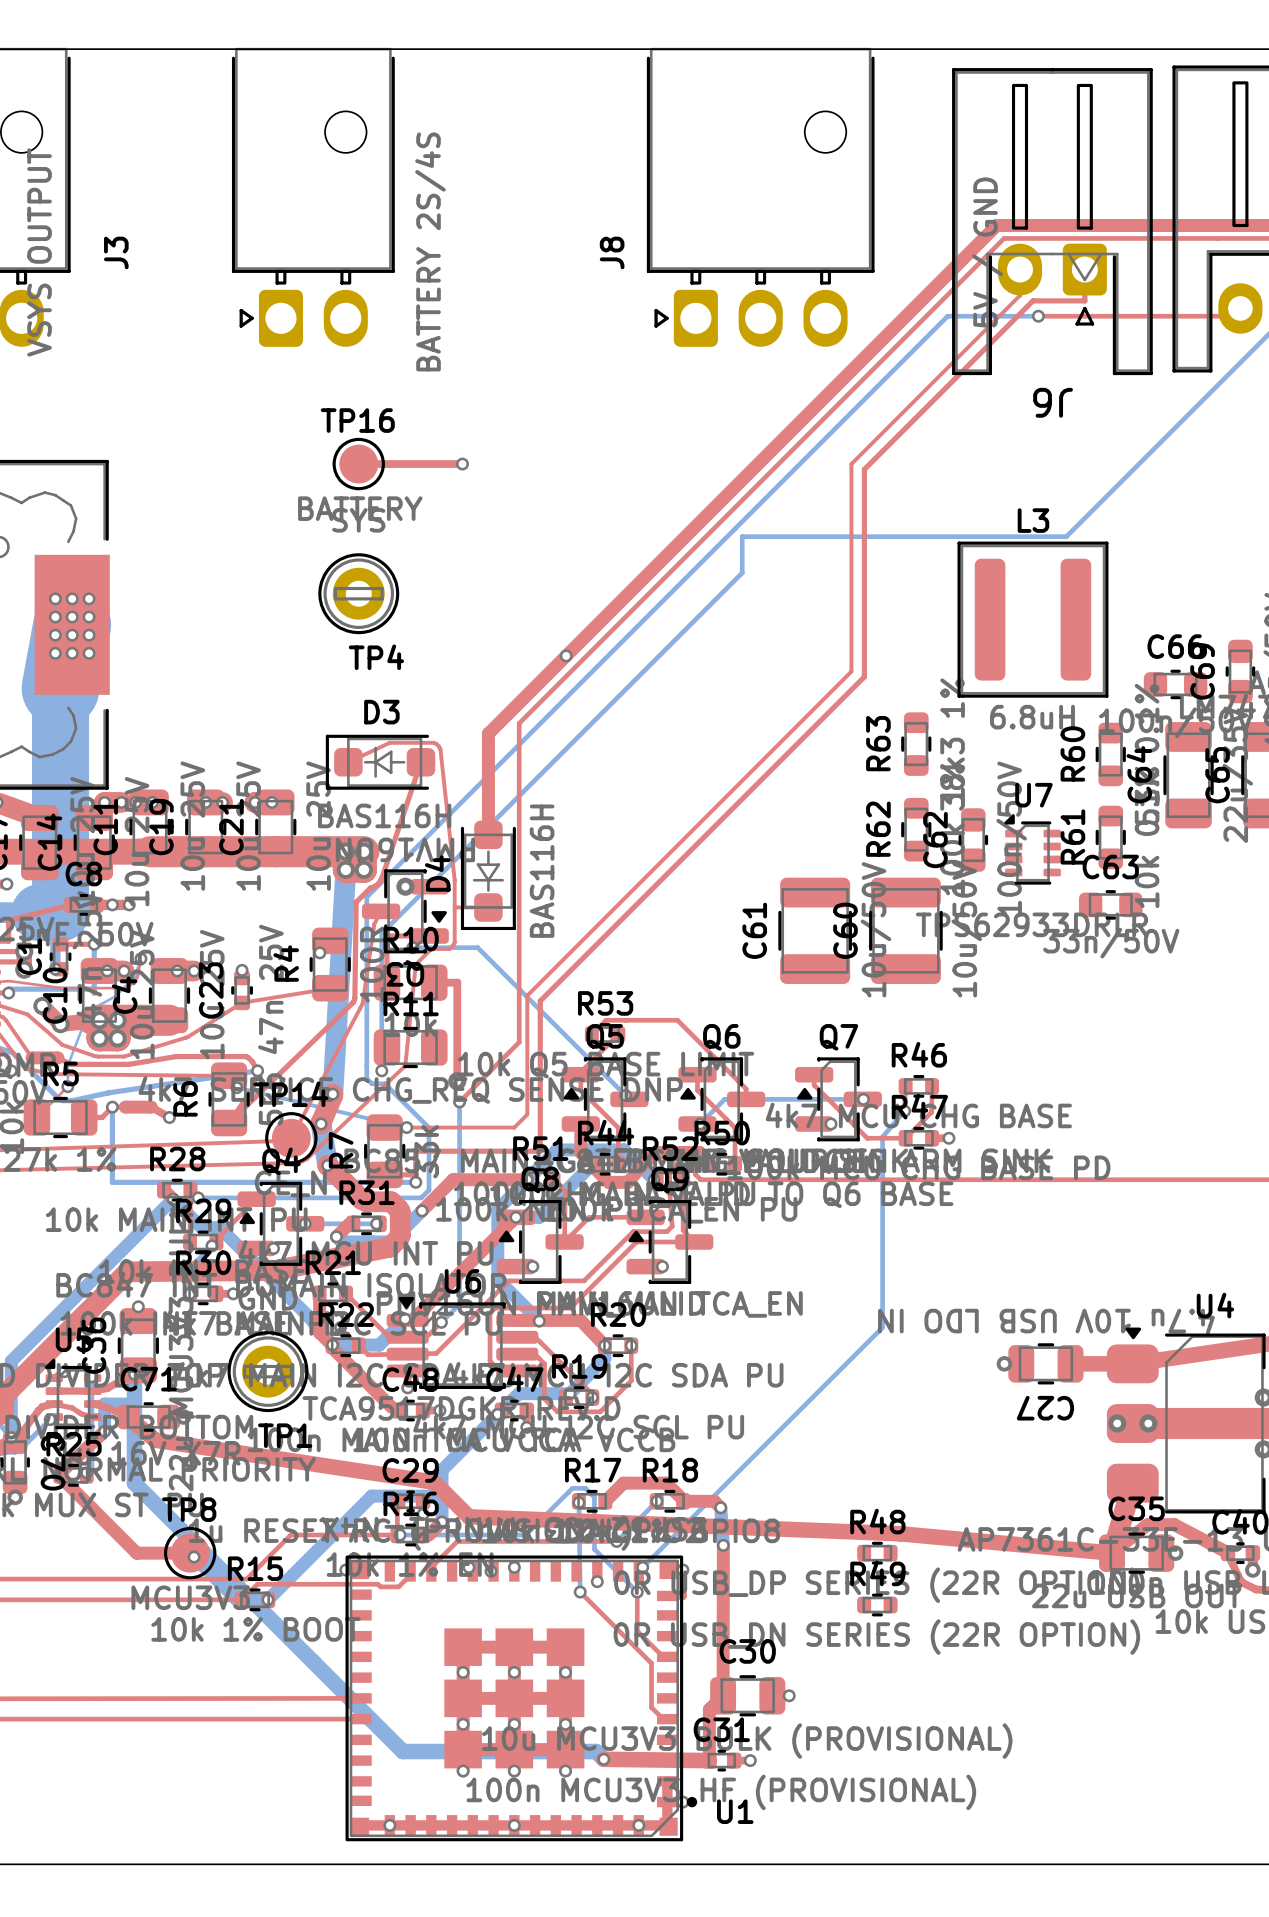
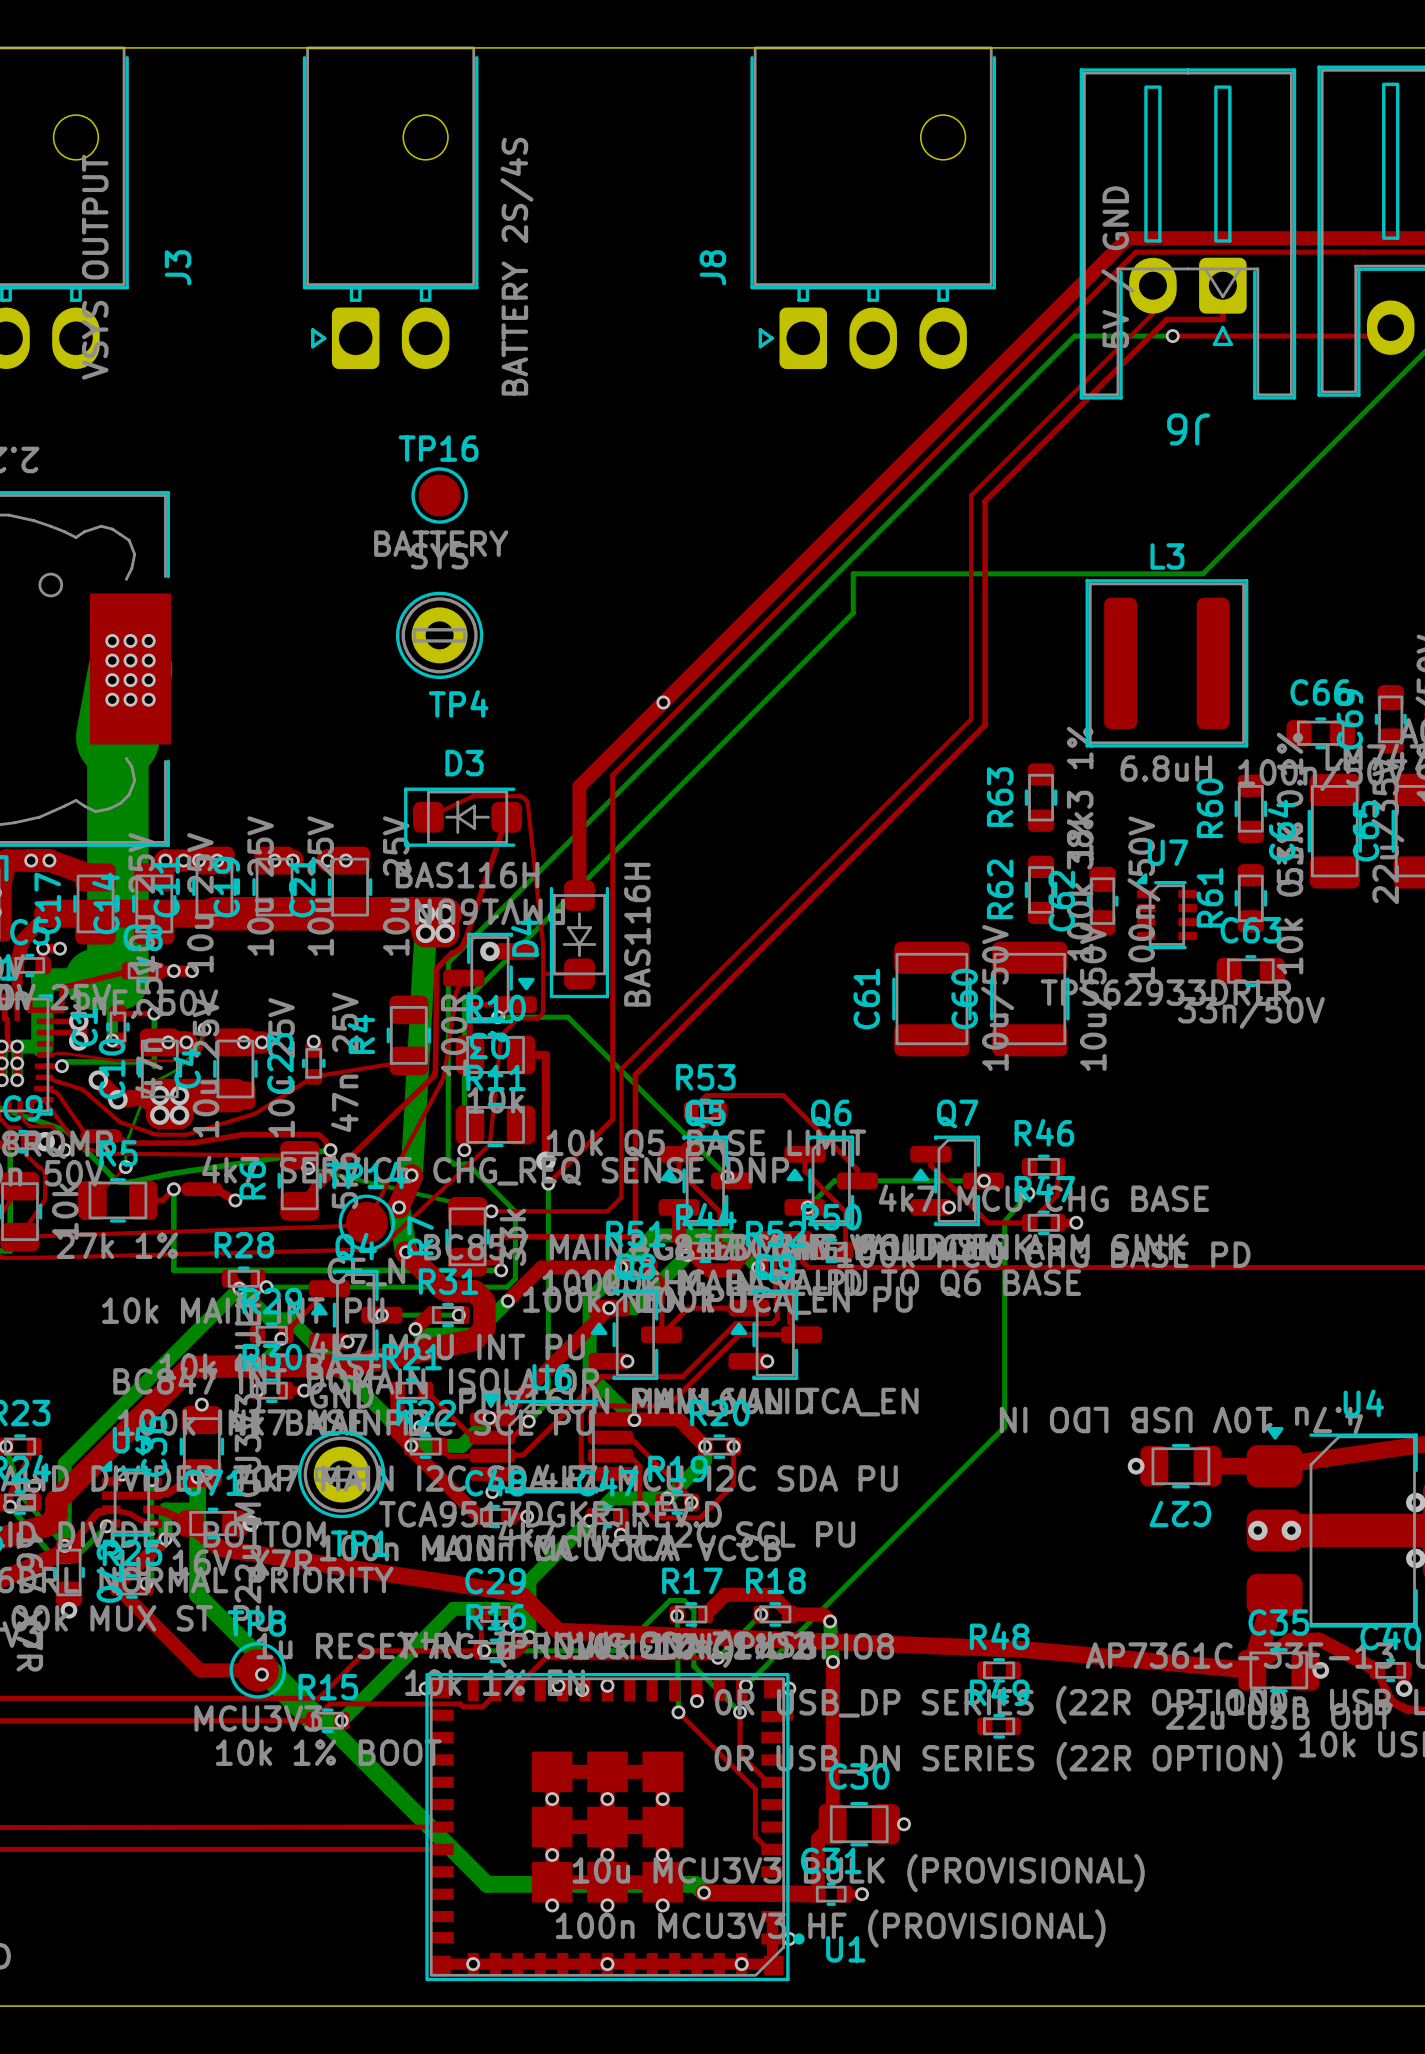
top track: (358, 464) (462, 464) -> none
via: (462, 464) -> none
via: (319, 952) -> none

